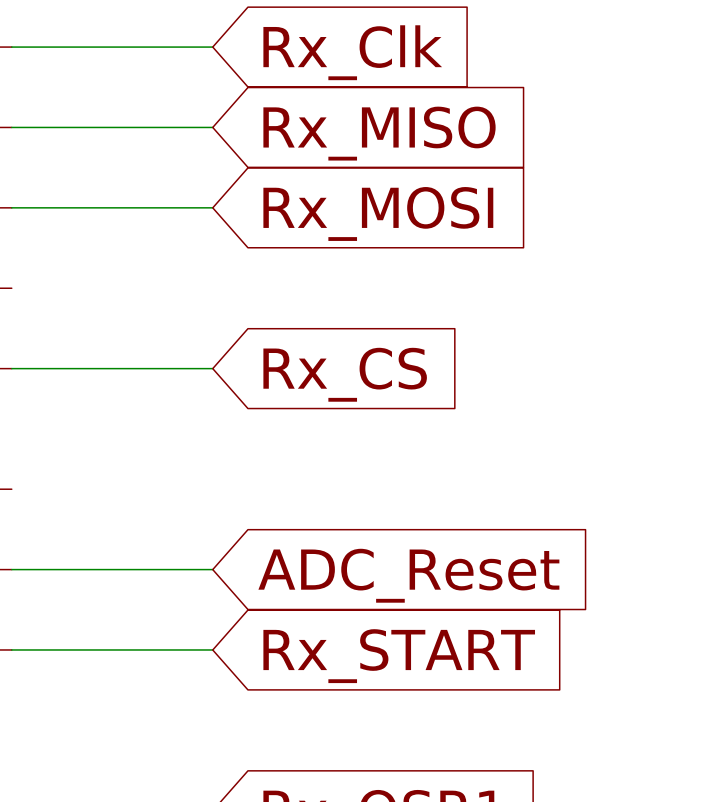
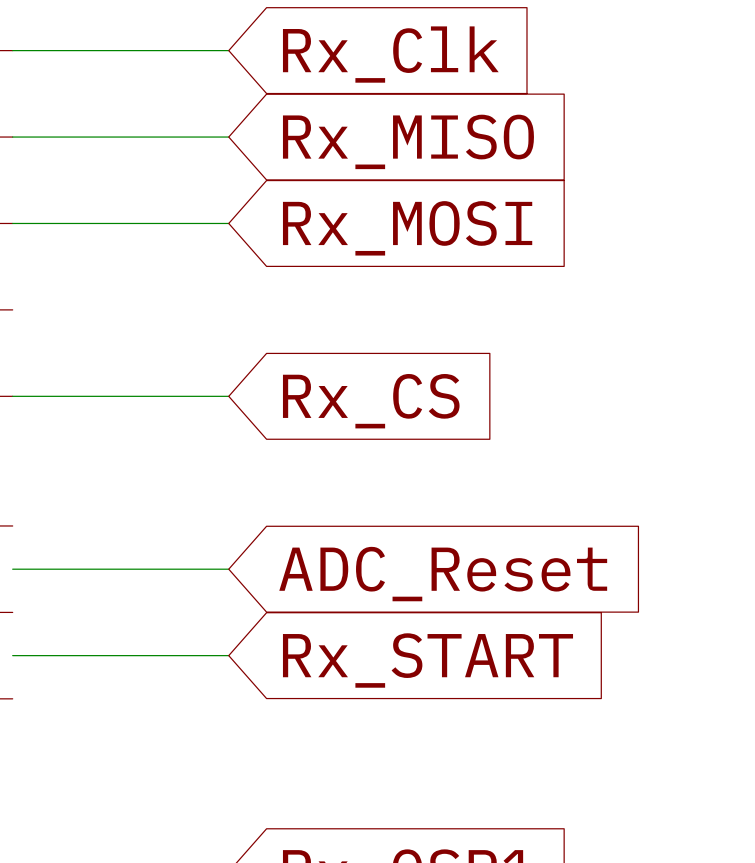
wire: (11, 569) (212, 569) -> (12, 655) (228, 655)
global label position: ADC_Reset (408, 575) -> ADC_Reset (443, 574)
wire: (11, 649) (212, 649) -> (12, 569) (228, 569)
global label position: Rx_START (399, 656) -> Rx_START (427, 660)

